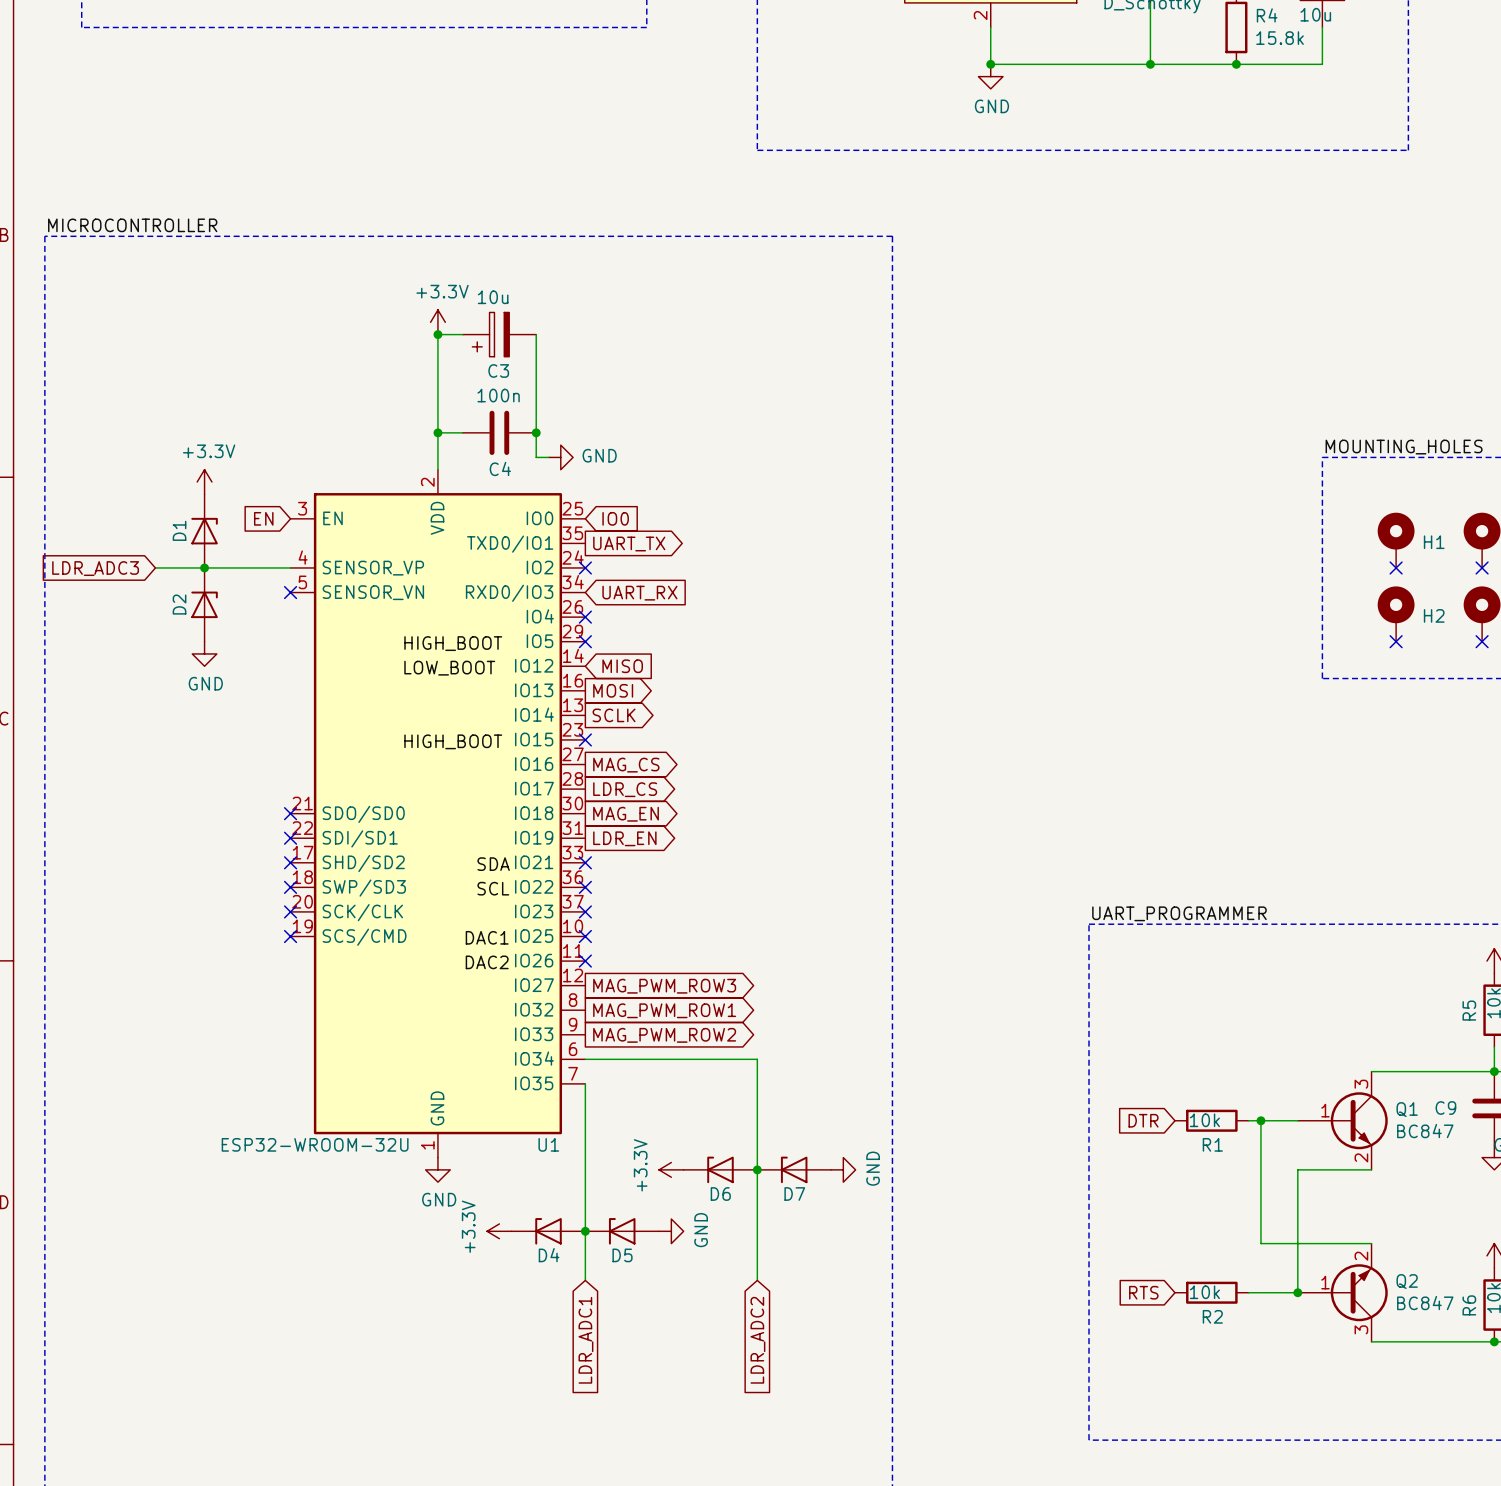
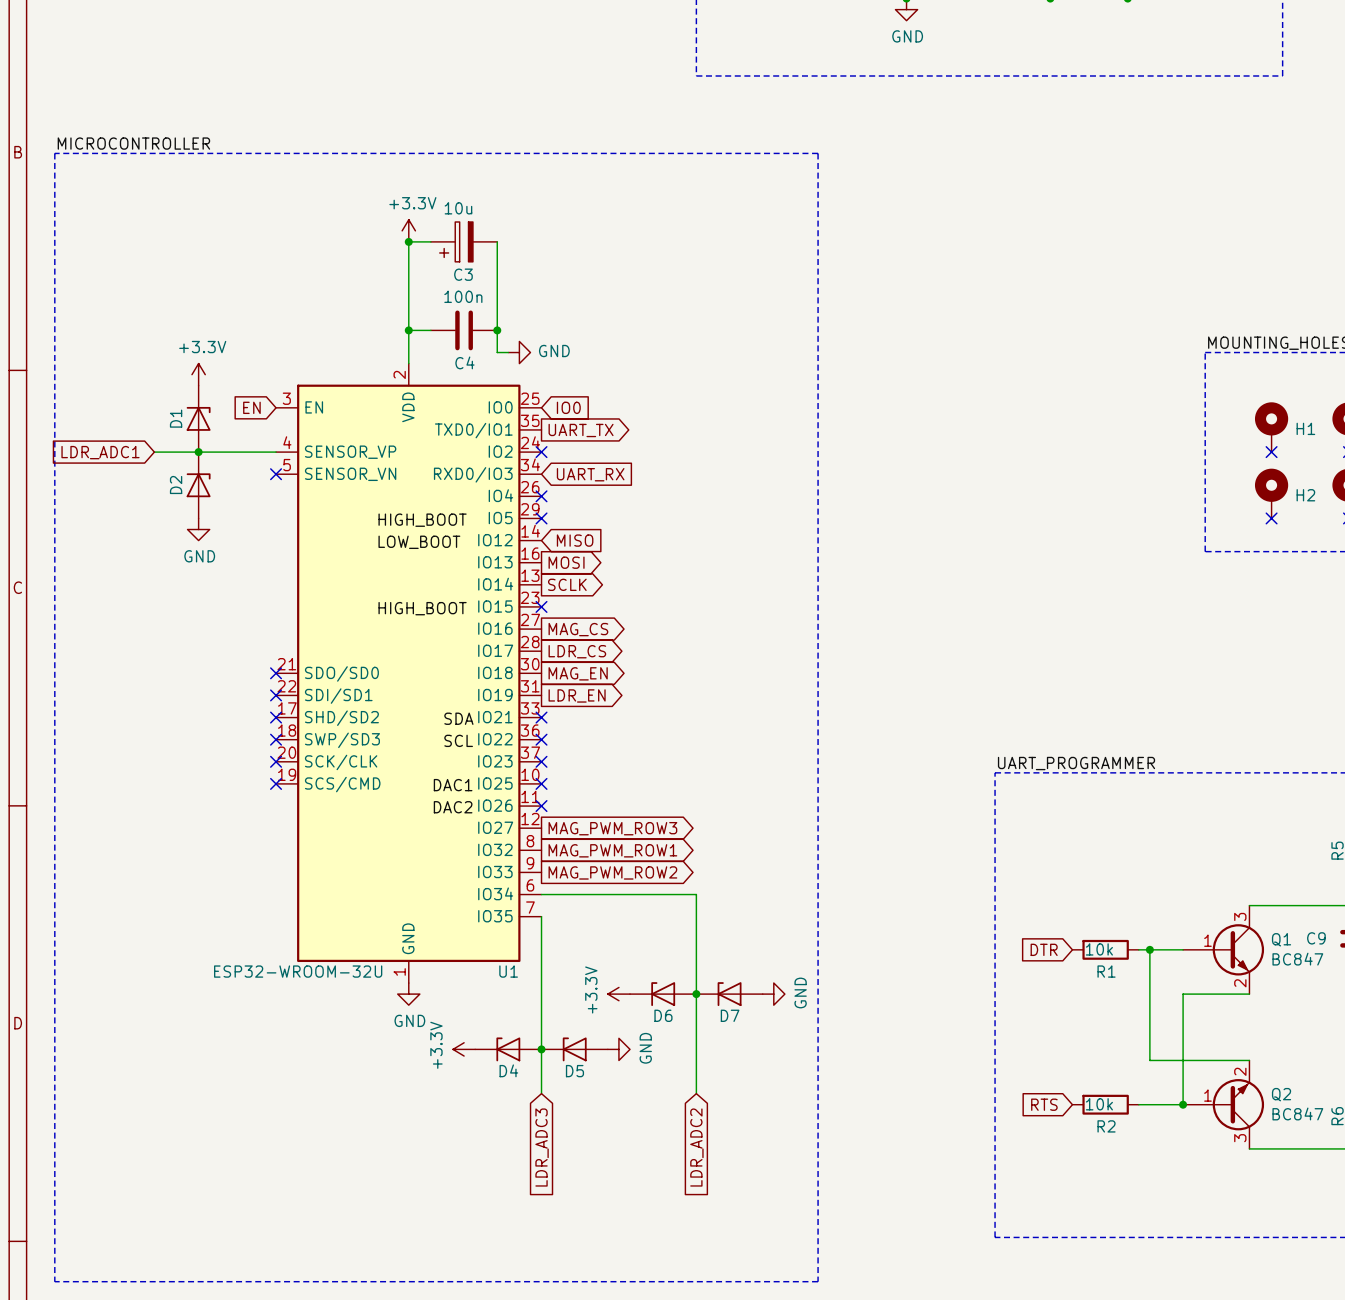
global label: LDR_ADC3 (95, 568) -> LDR_ADC1 (100, 452)
global label: LDR_ADC1 (585, 1340) -> LDR_ADC3 (542, 1147)

